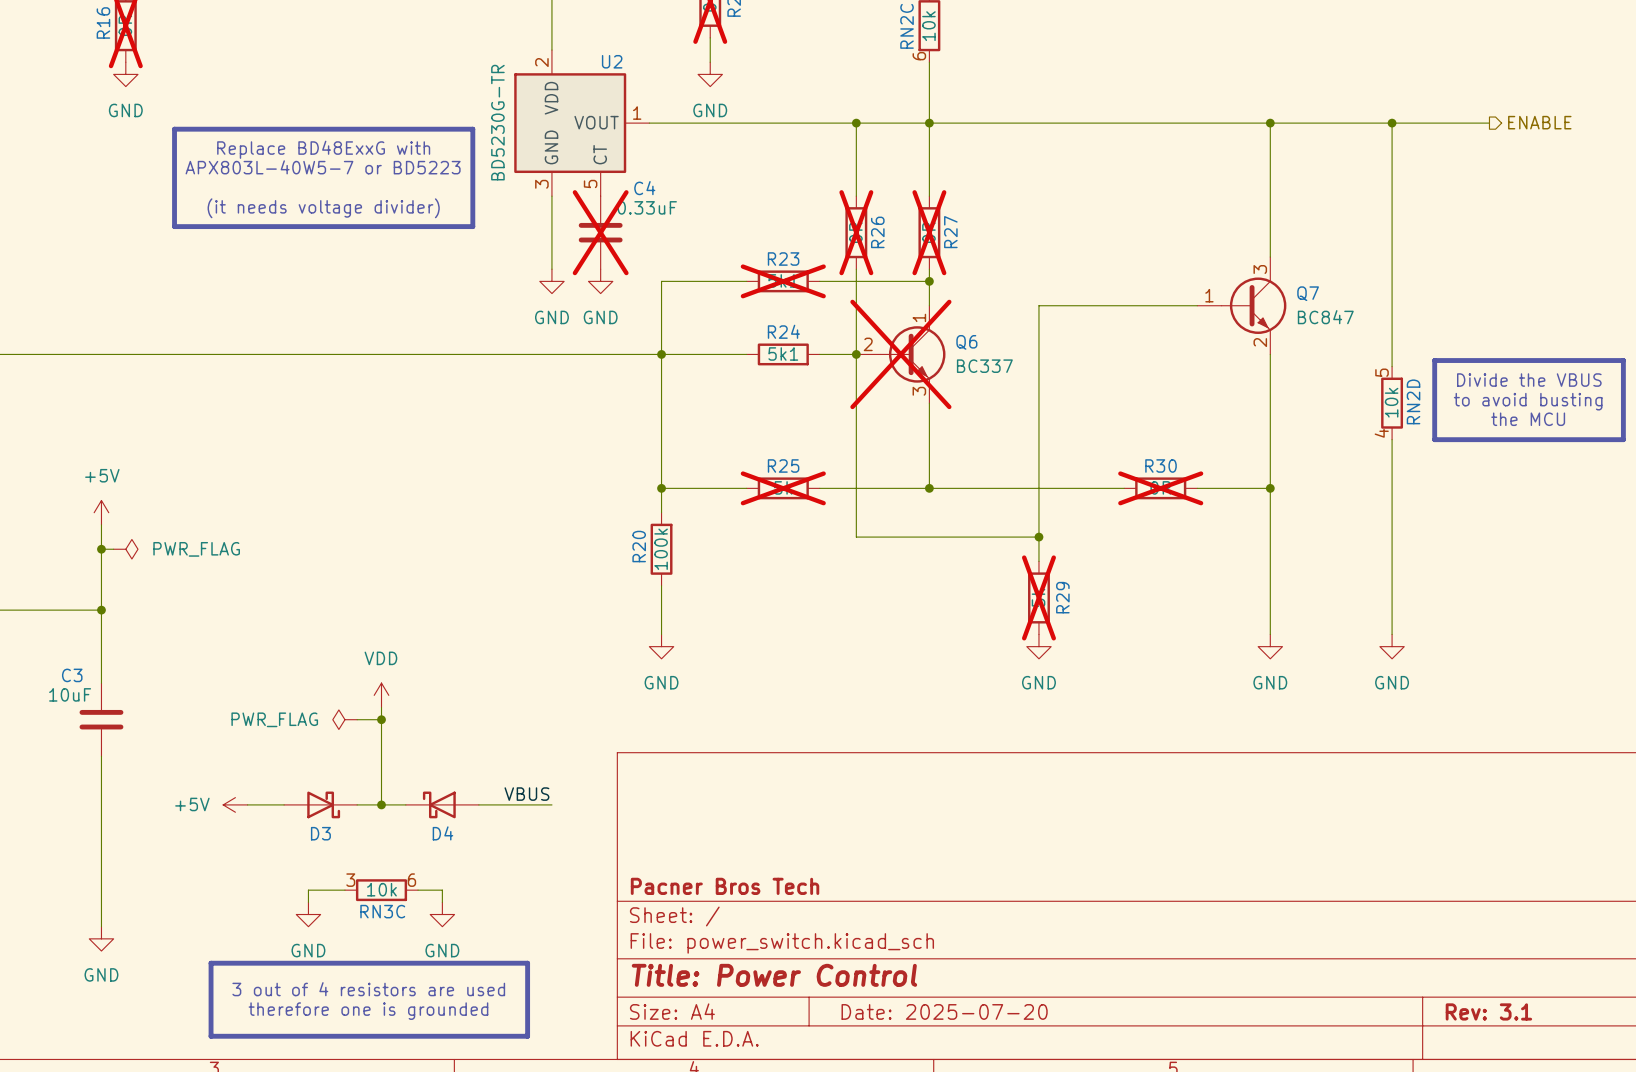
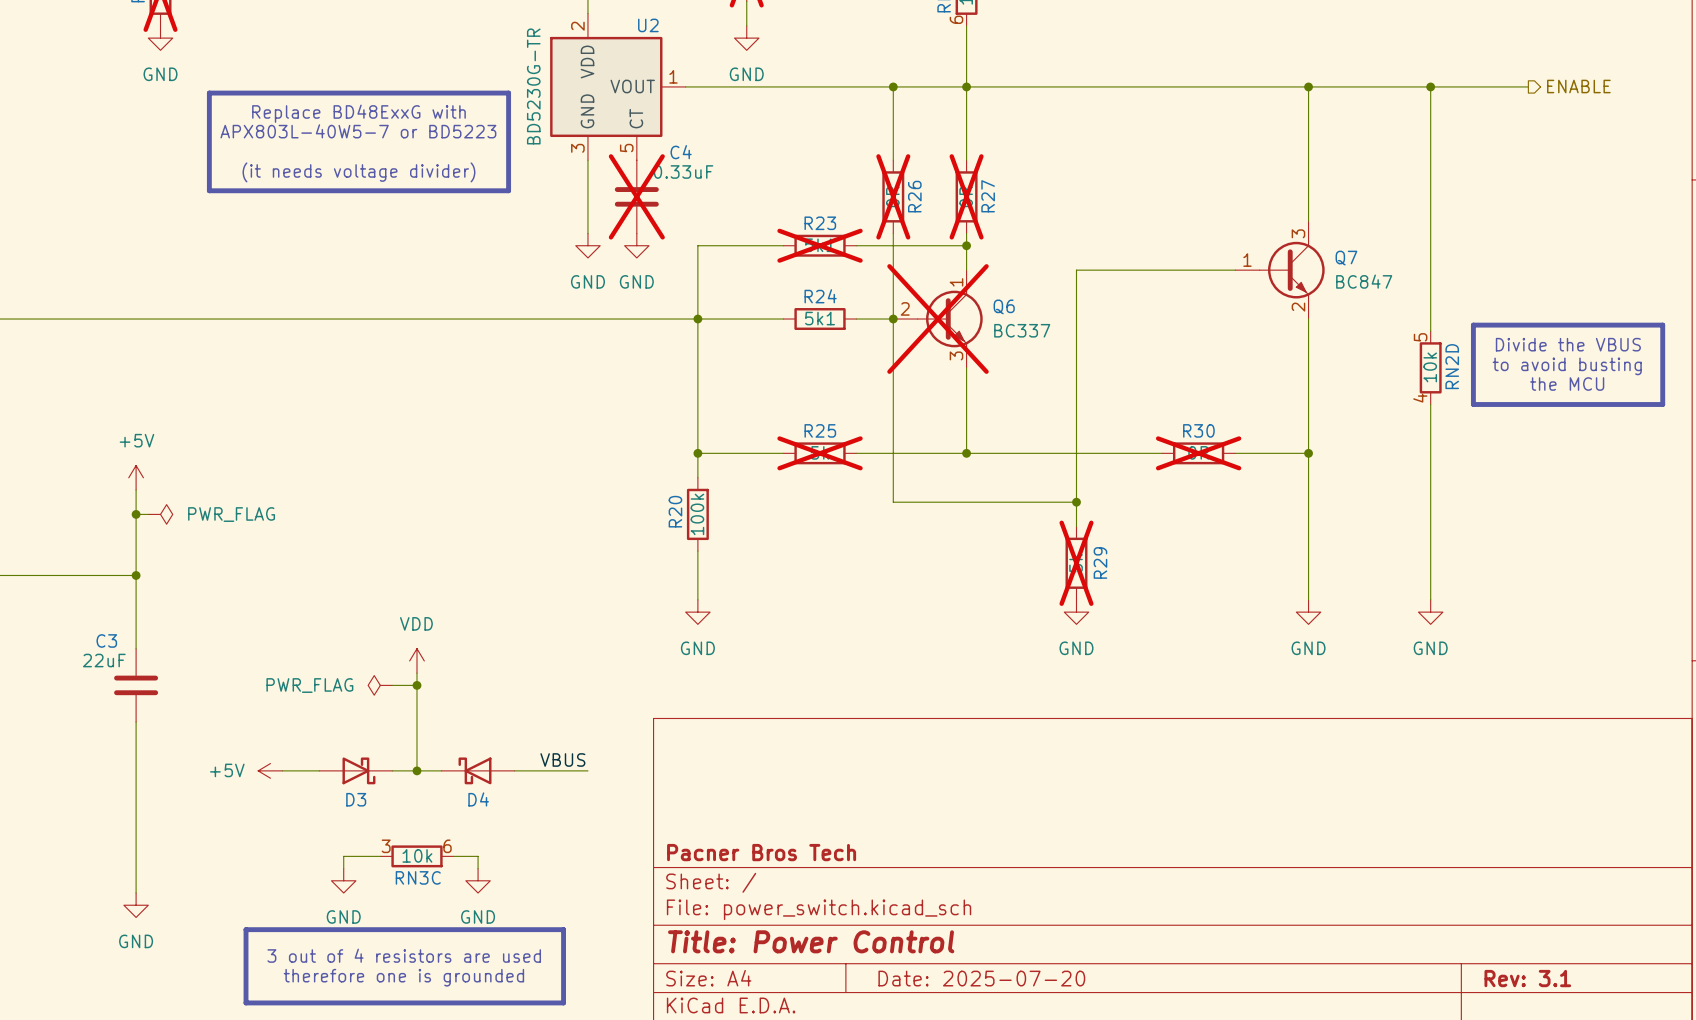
C3 value: 10uF (70, 694) -> 22uF (104, 660)

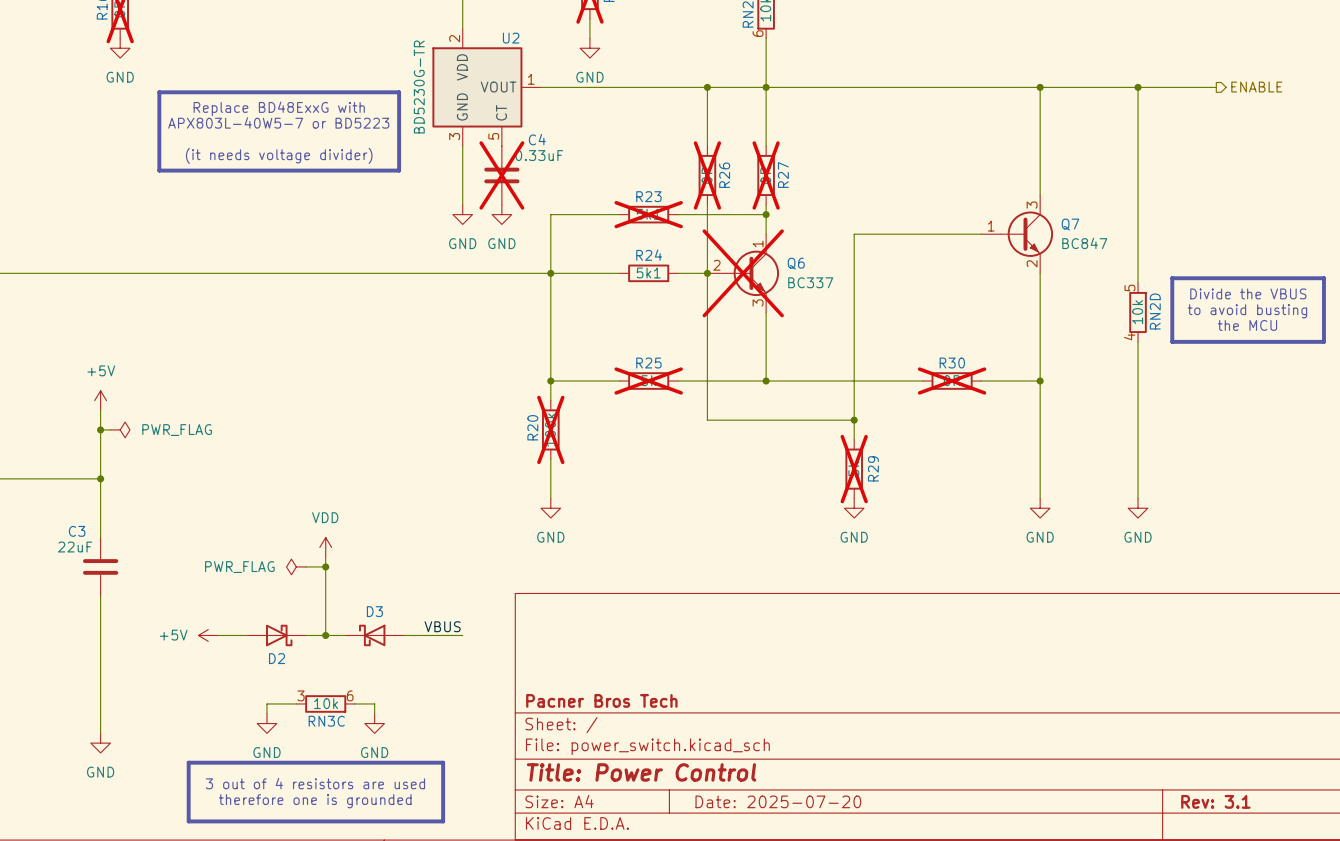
R20 do-not-place cross: none -> (550, 429)
D3 name: D3 (356, 799) -> D2 (277, 658)
D4 name: D4 (478, 799) -> D3 (374, 611)

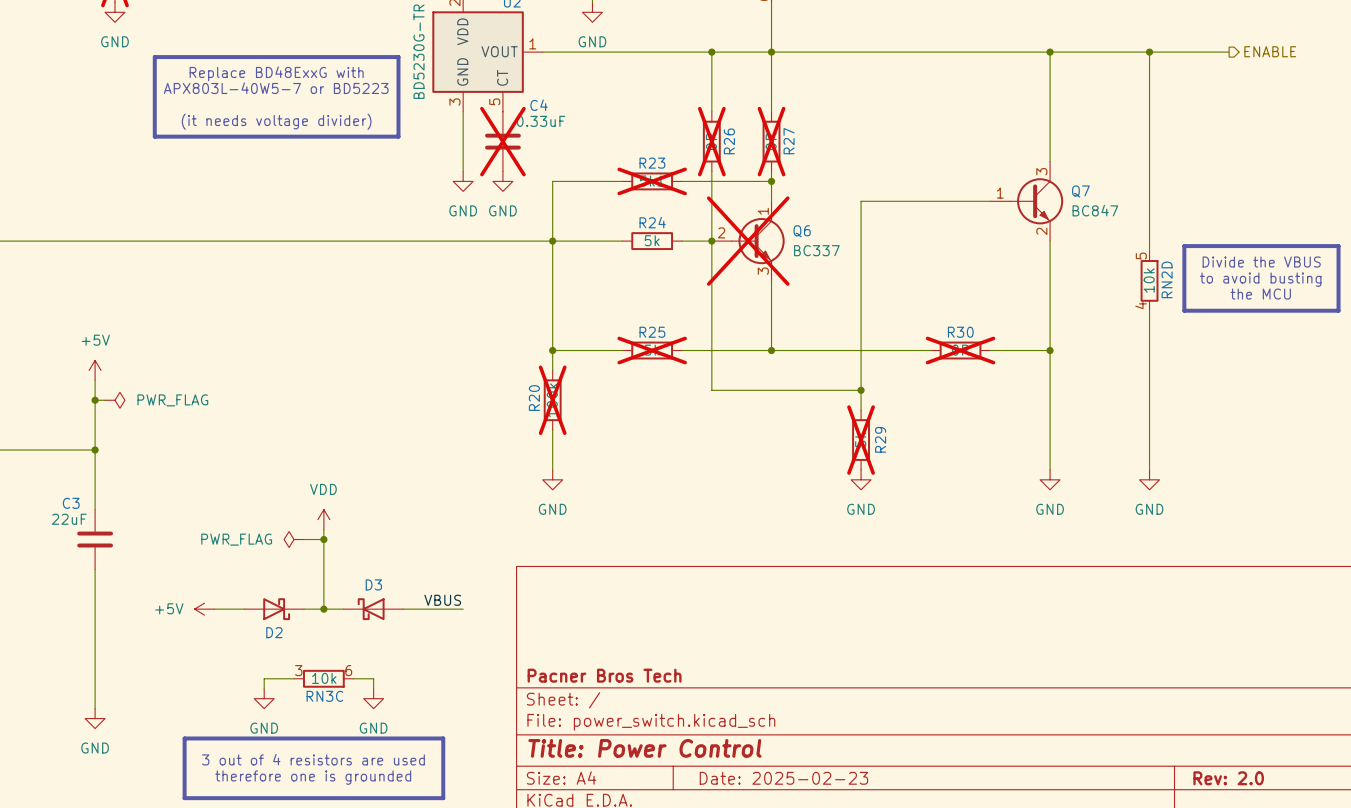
R24 value: 5k1 (648, 272) -> 5k (652, 240)
title block: Date: 2025-07-20 (778, 801) -> Date: 2025-02-23 (783, 778)
title block: Rev: 3.1 (1215, 801) -> Rev: 2.0 (1228, 778)

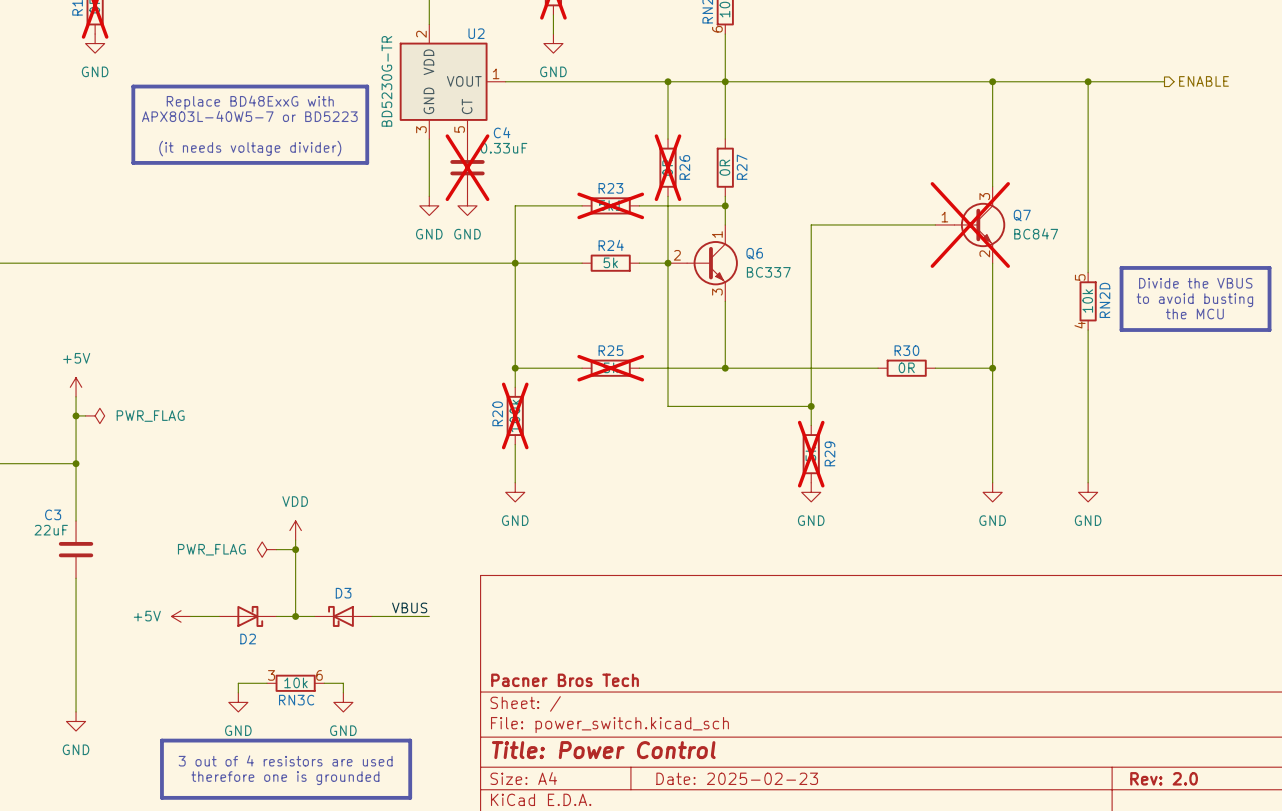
R27 do-not-place cross: (771, 141) -> none
Q7 do-not-place cross: none -> (970, 224)
Q6 do-not-place cross: (748, 241) -> none
R30 do-not-place cross: (960, 350) -> none

